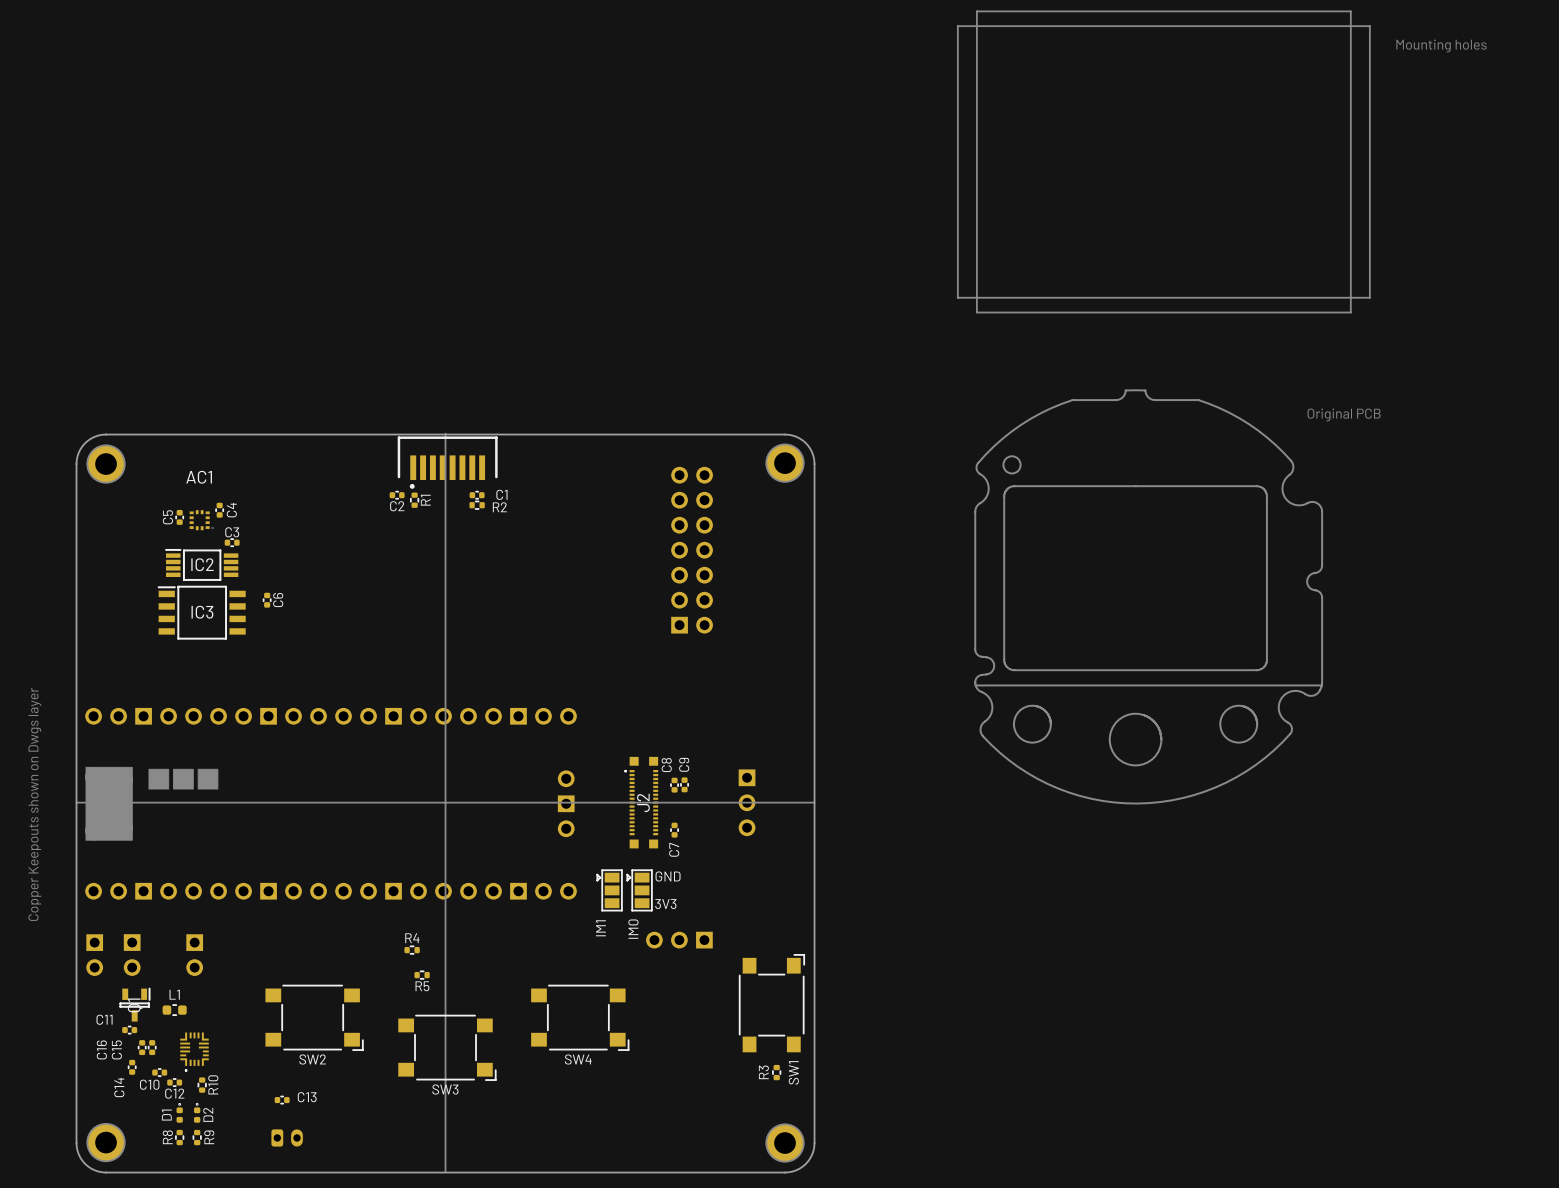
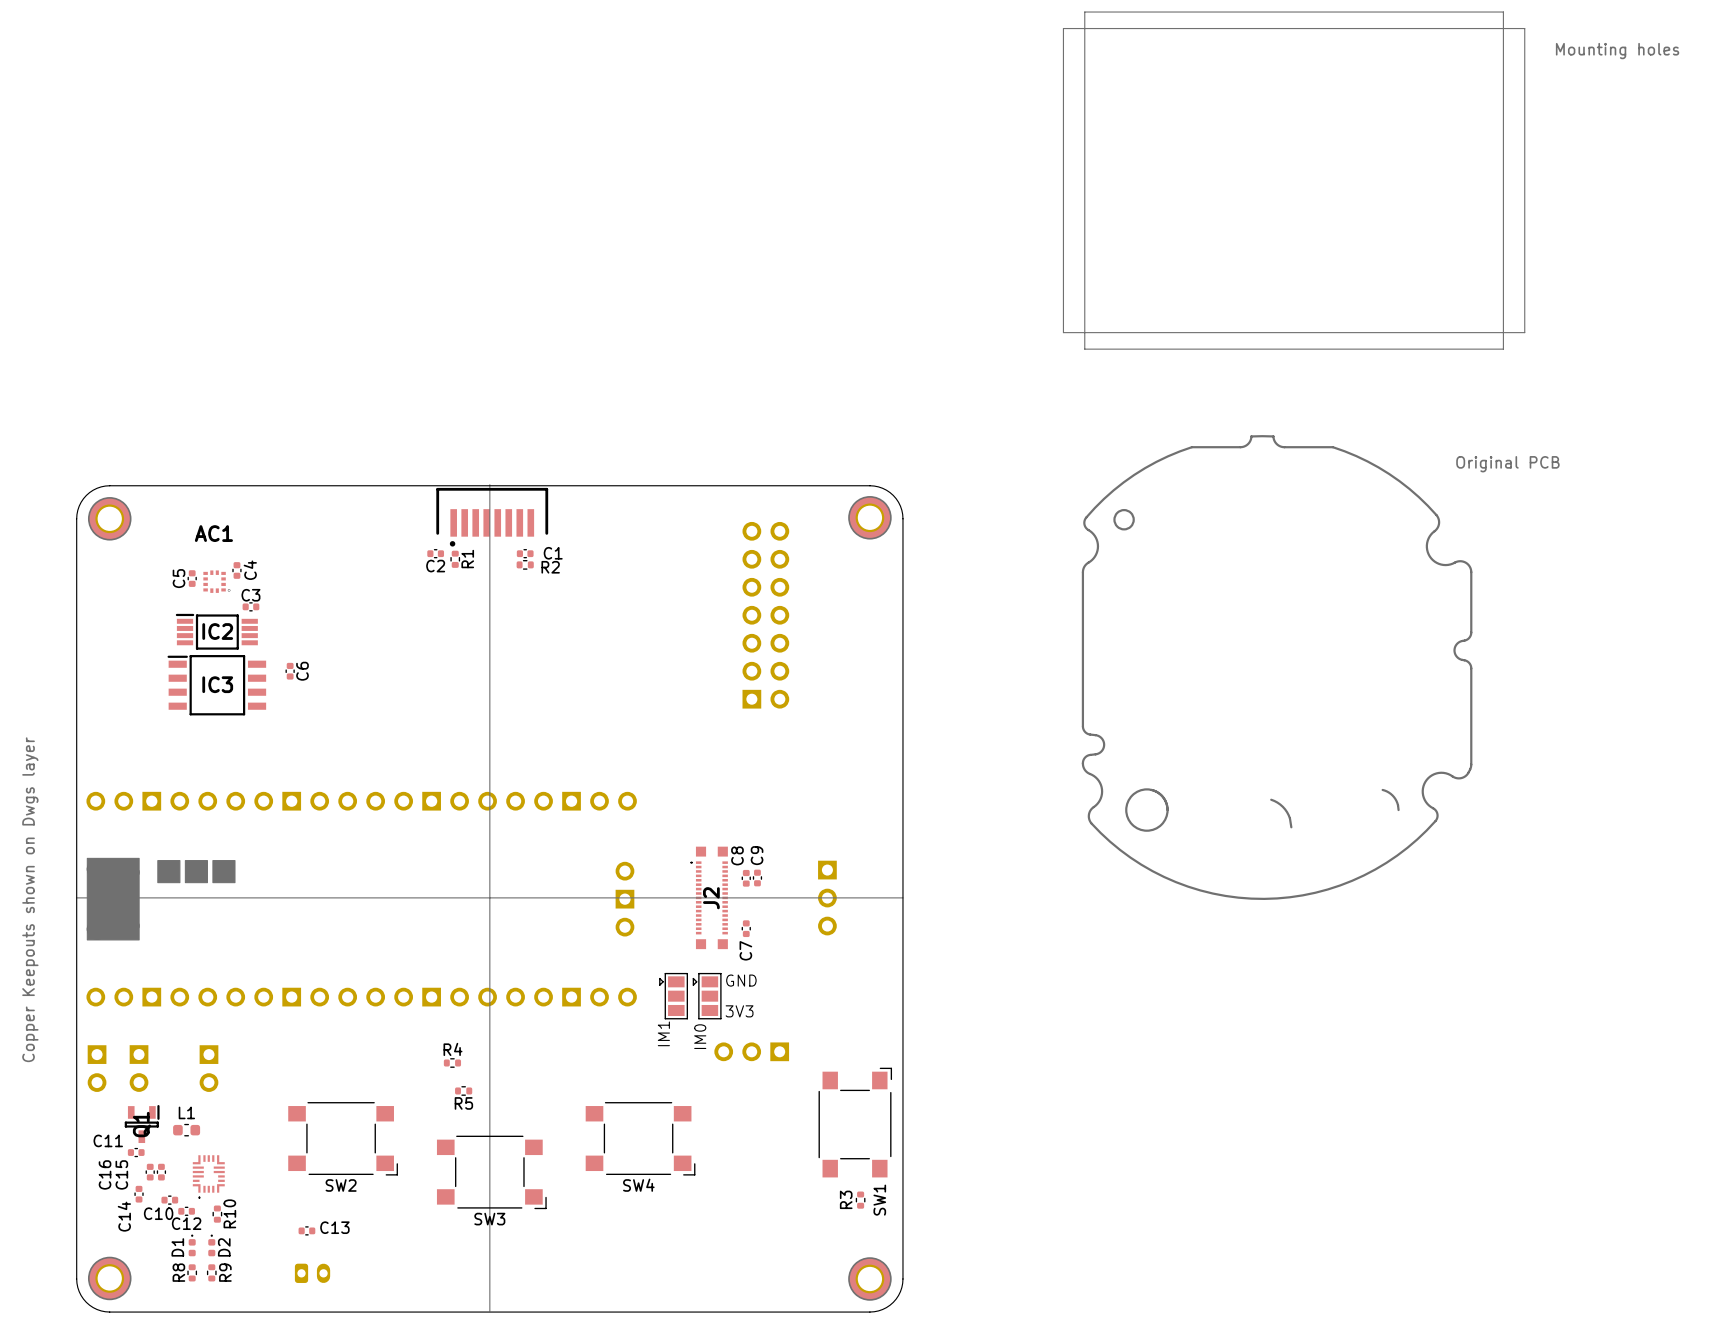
line: (1013, 486) (1007, 489) (1004, 496) (1004, 660) (1008, 668) (1014, 670) (1256, 670) (1265, 665) (1266, 659) (1266, 496) (1262, 488) (1256, 486) (1013, 486) -> none
line: (975, 685) (1321, 685) -> none
drawing: [1219, 704, 1259, 744] -> none
drawing: [1108, 712, 1163, 767] -> none

